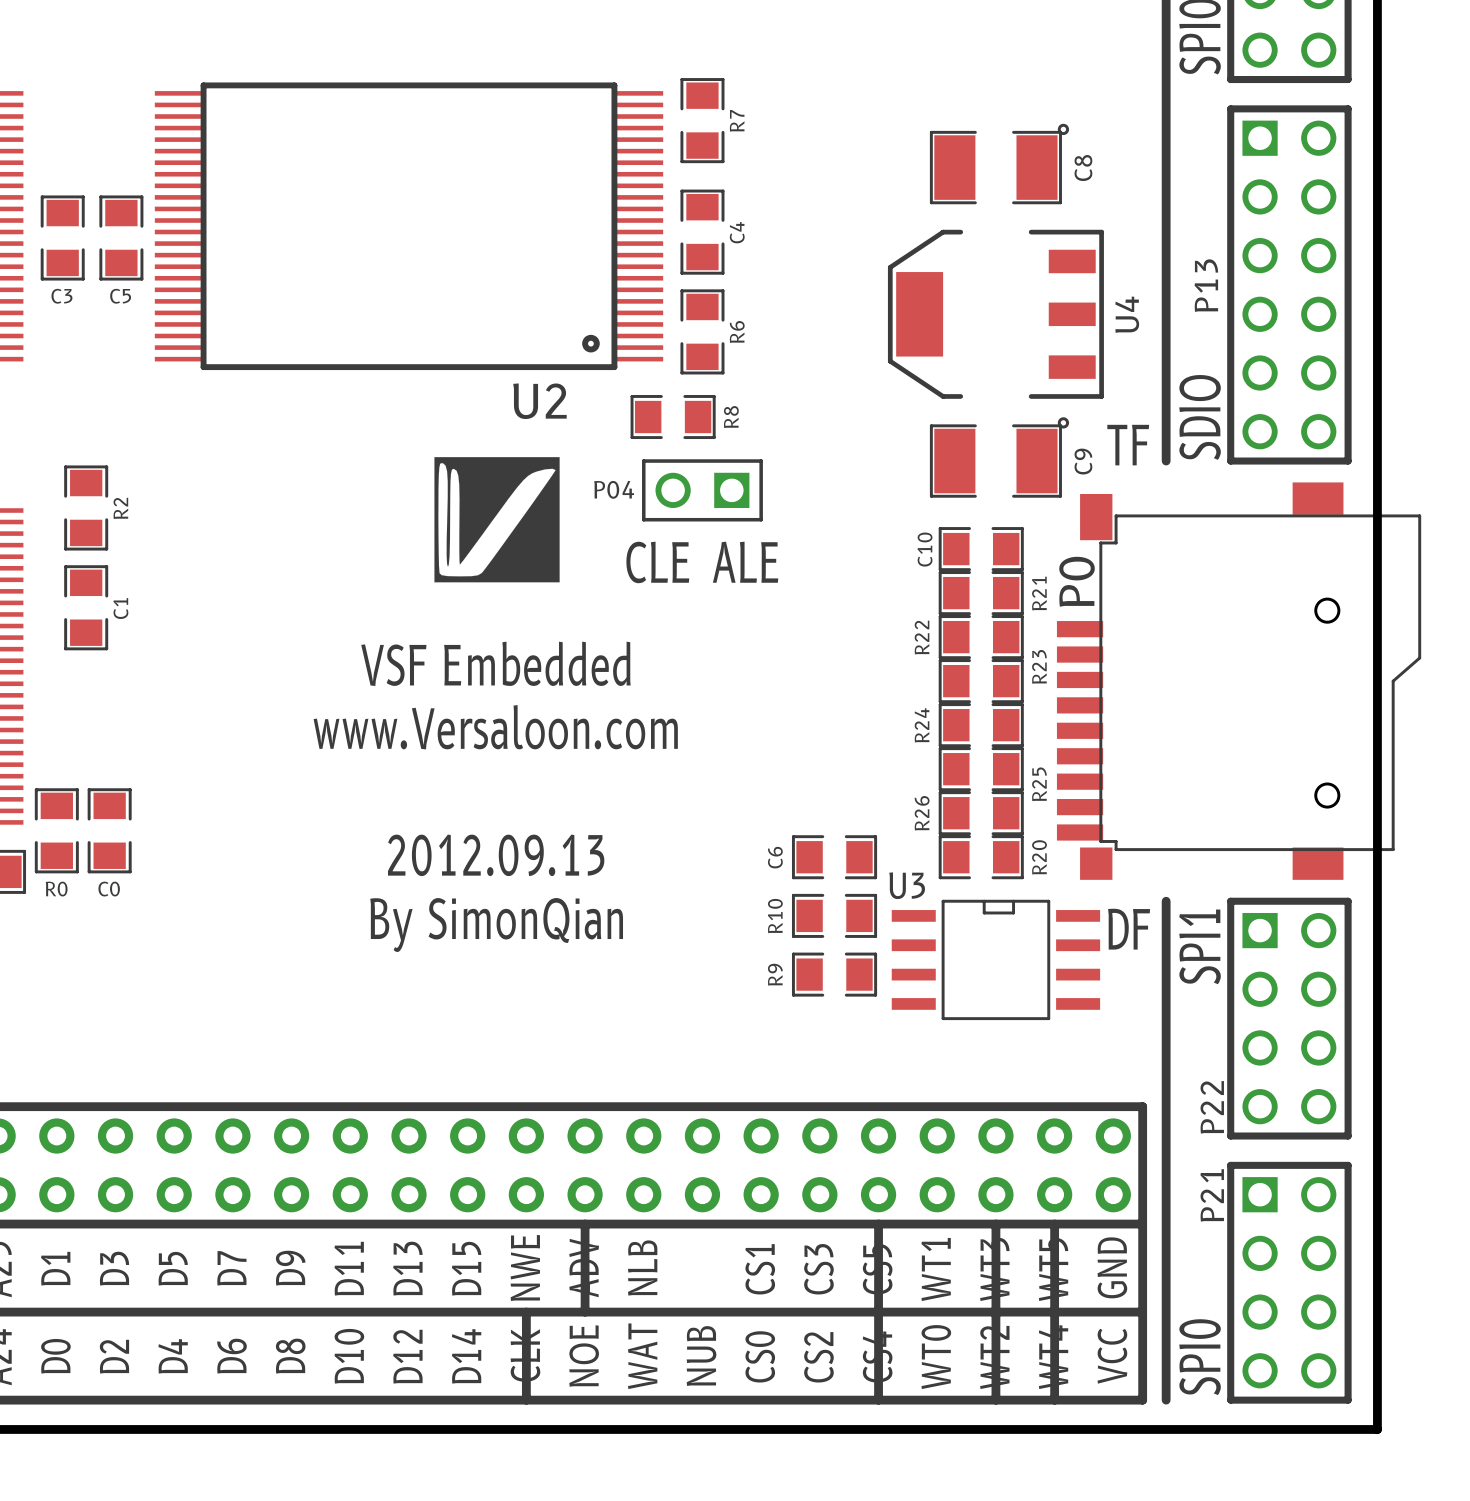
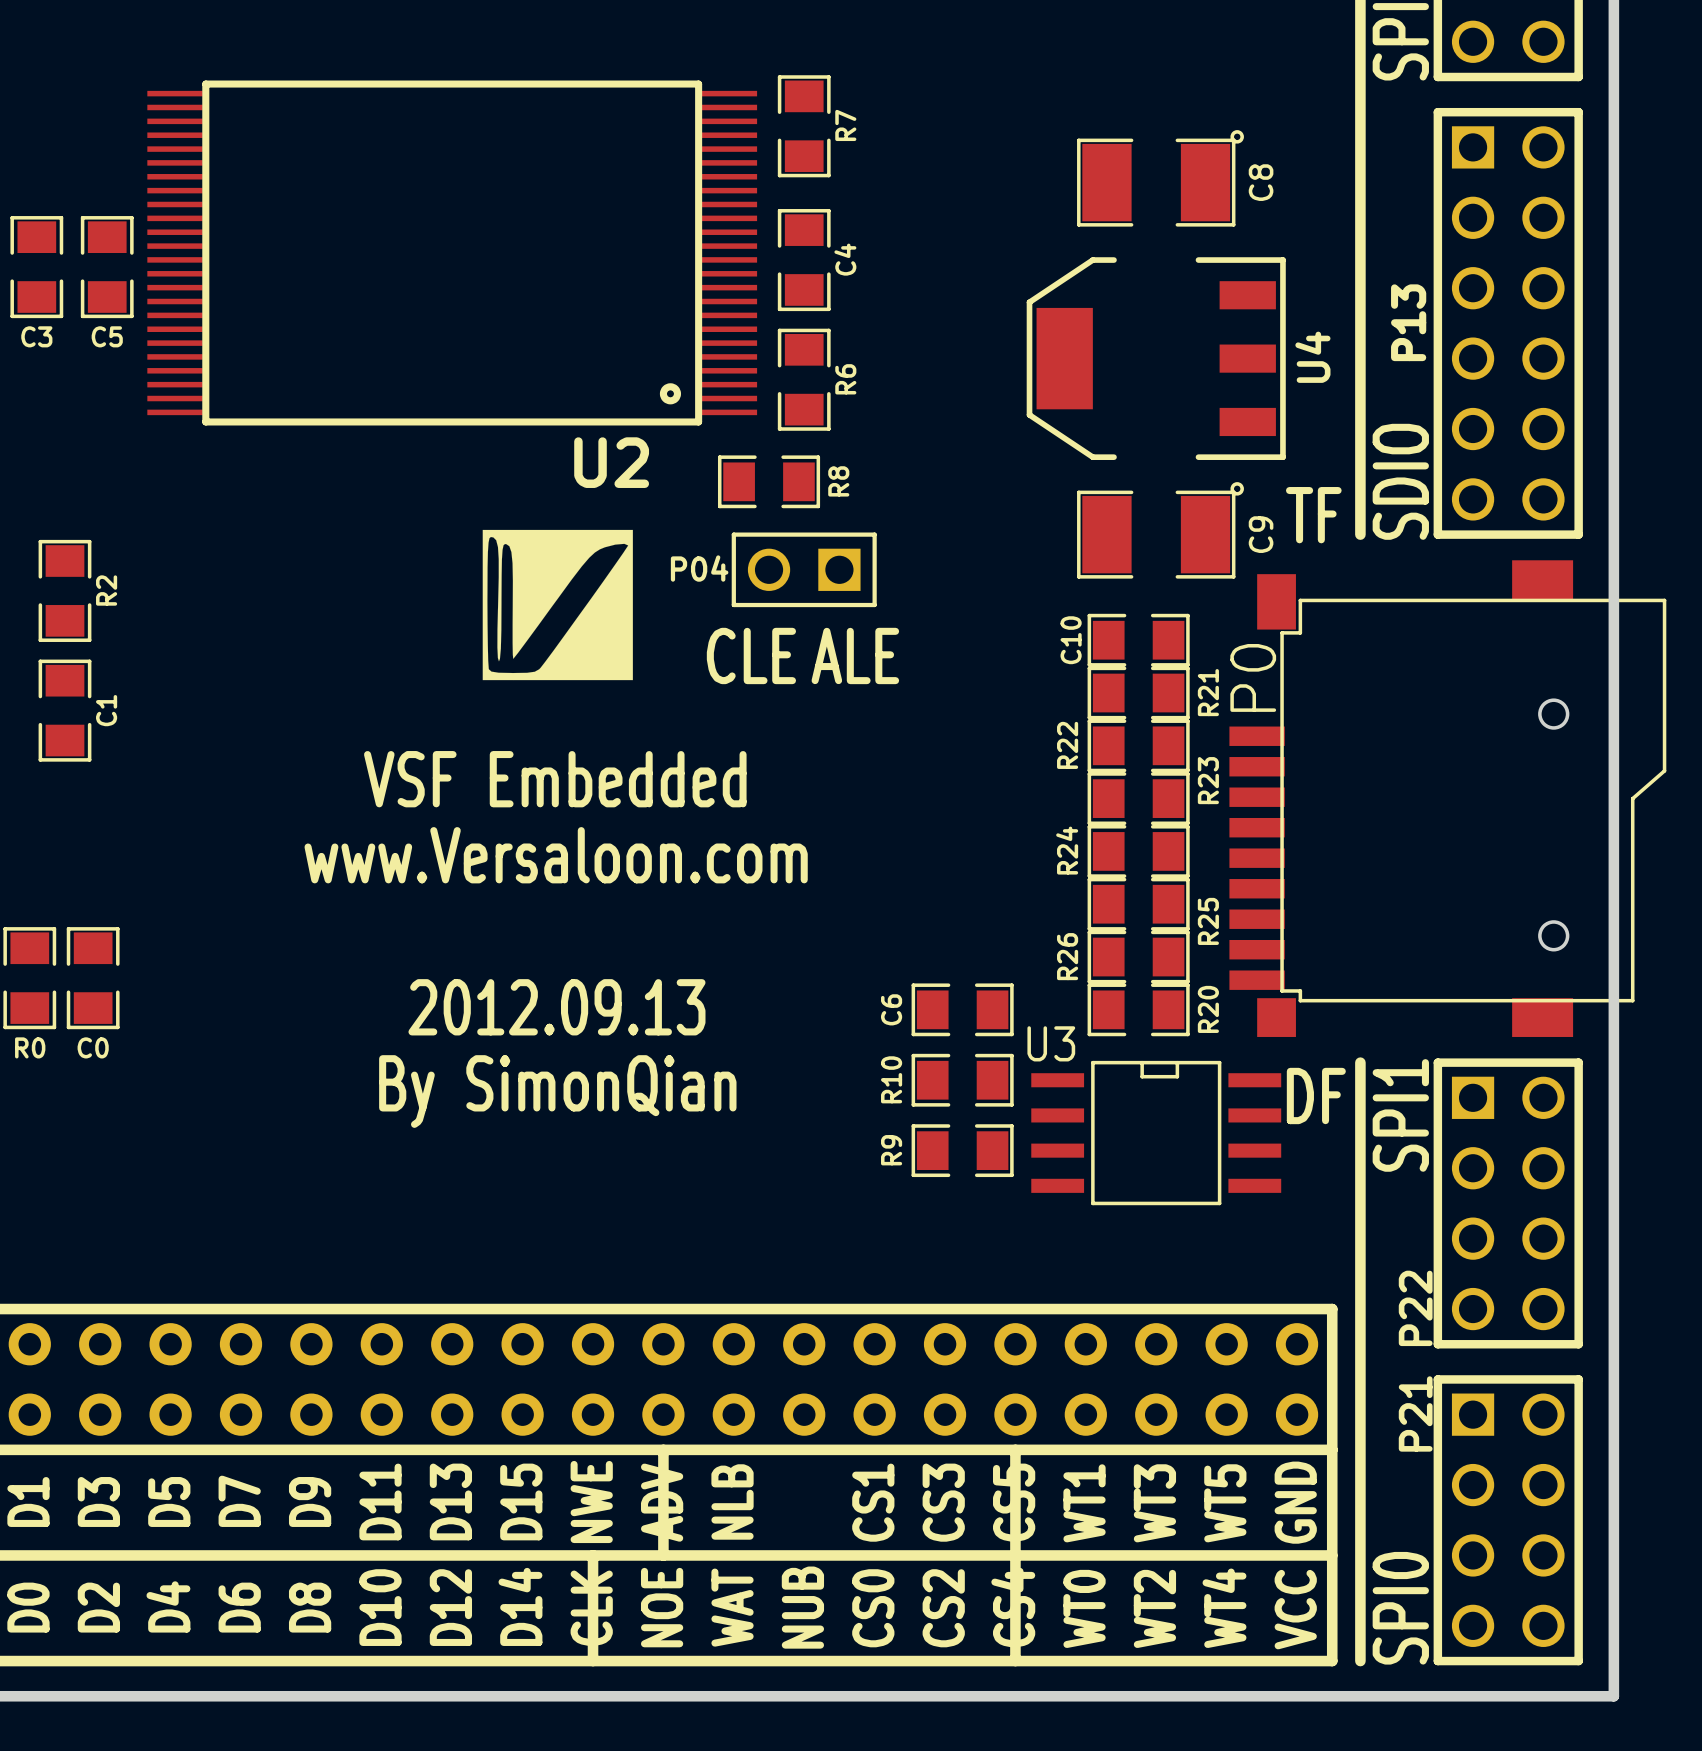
line: (995, 1224) (995, 1400) -> none
line: (1054, 1224) (1054, 1400) -> none

